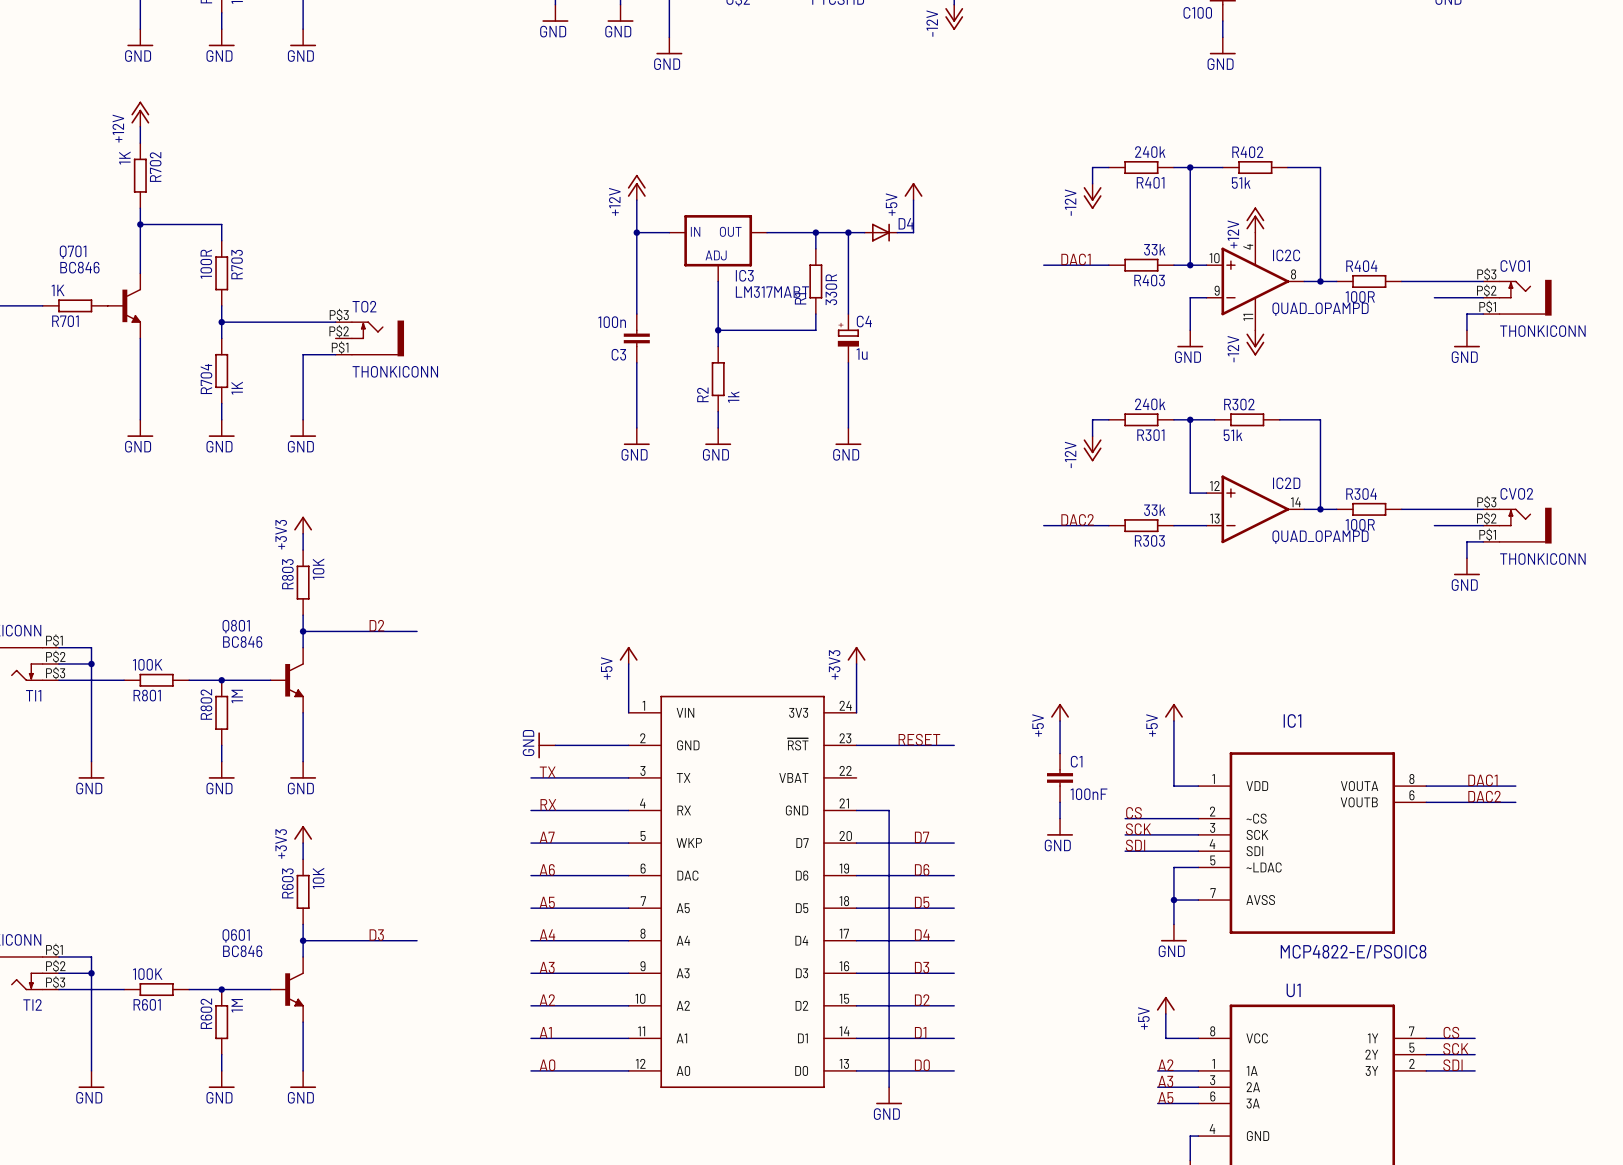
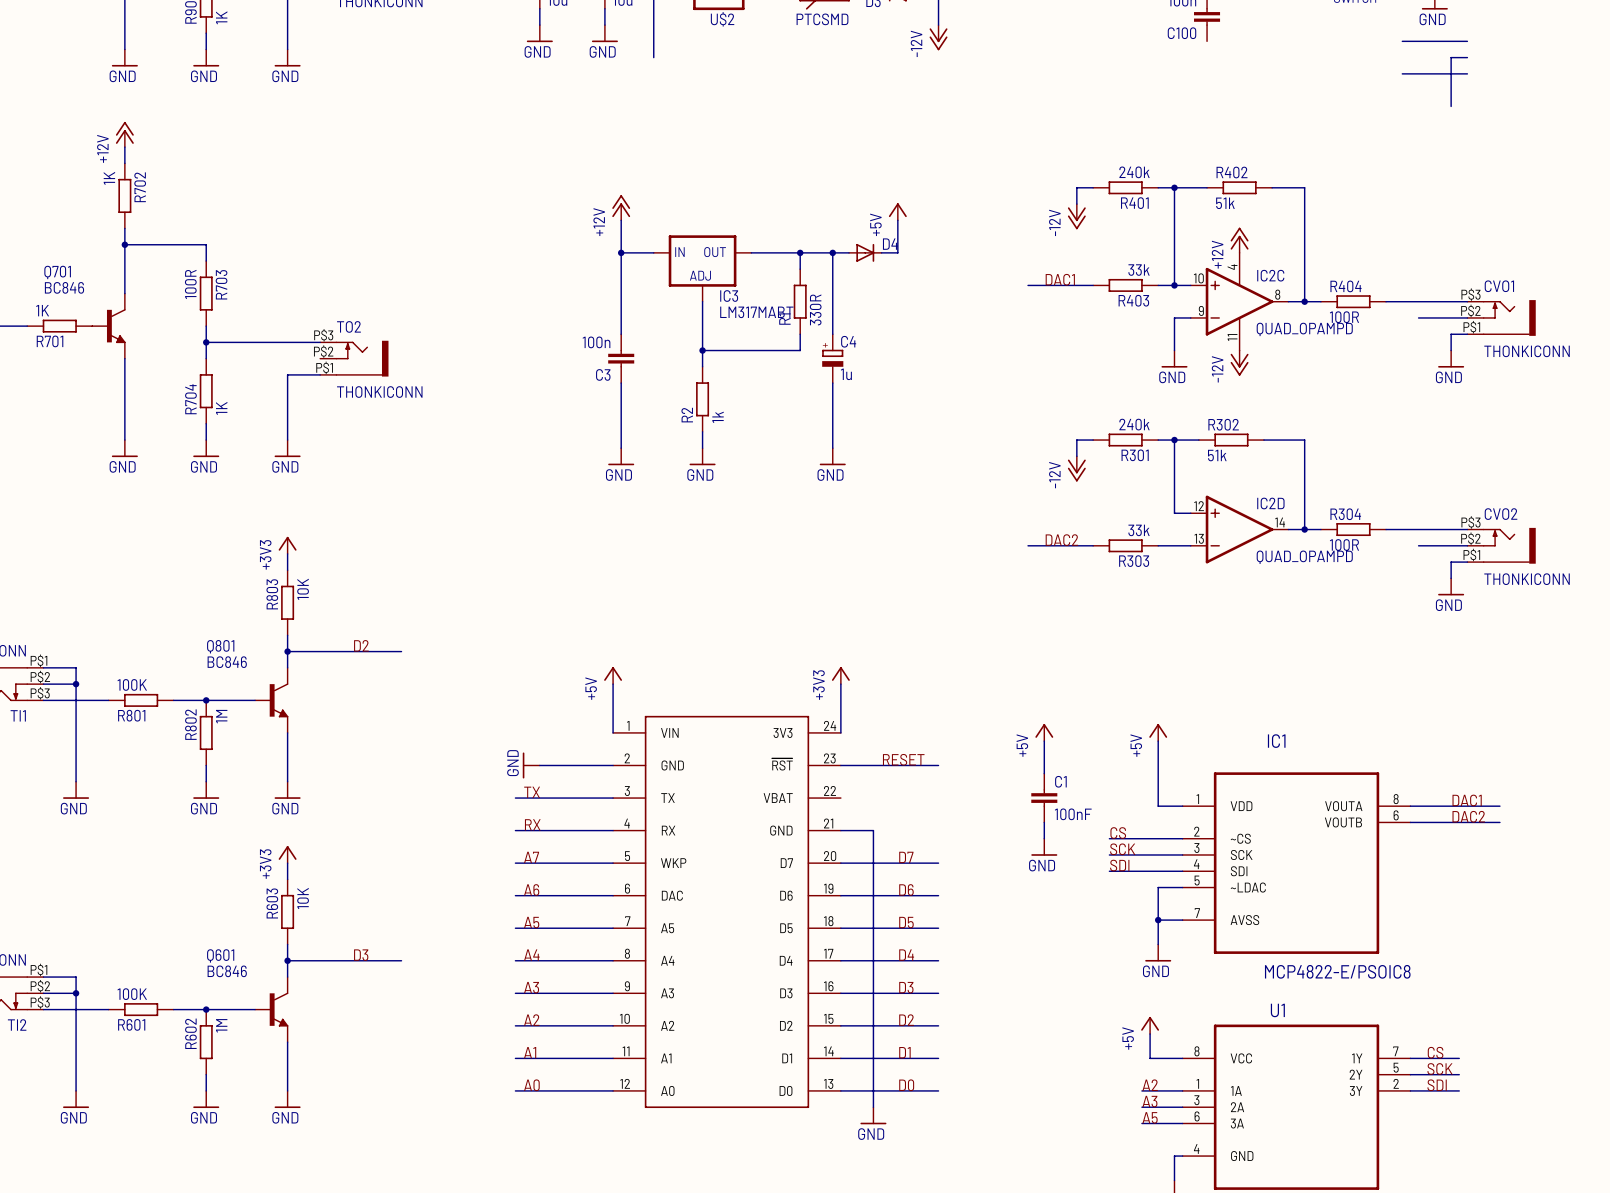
wire: (1222, 21) (1222, 37) -> none
wire: none -> (1402, 41) (1467, 41)
wire: none -> (1467, 57) (1451, 57) (1451, 106)
power symbol: GND (669, 45) -> none
power symbol: GND (1222, 45) -> none
wire: none -> (1402, 73) (1467, 73)

